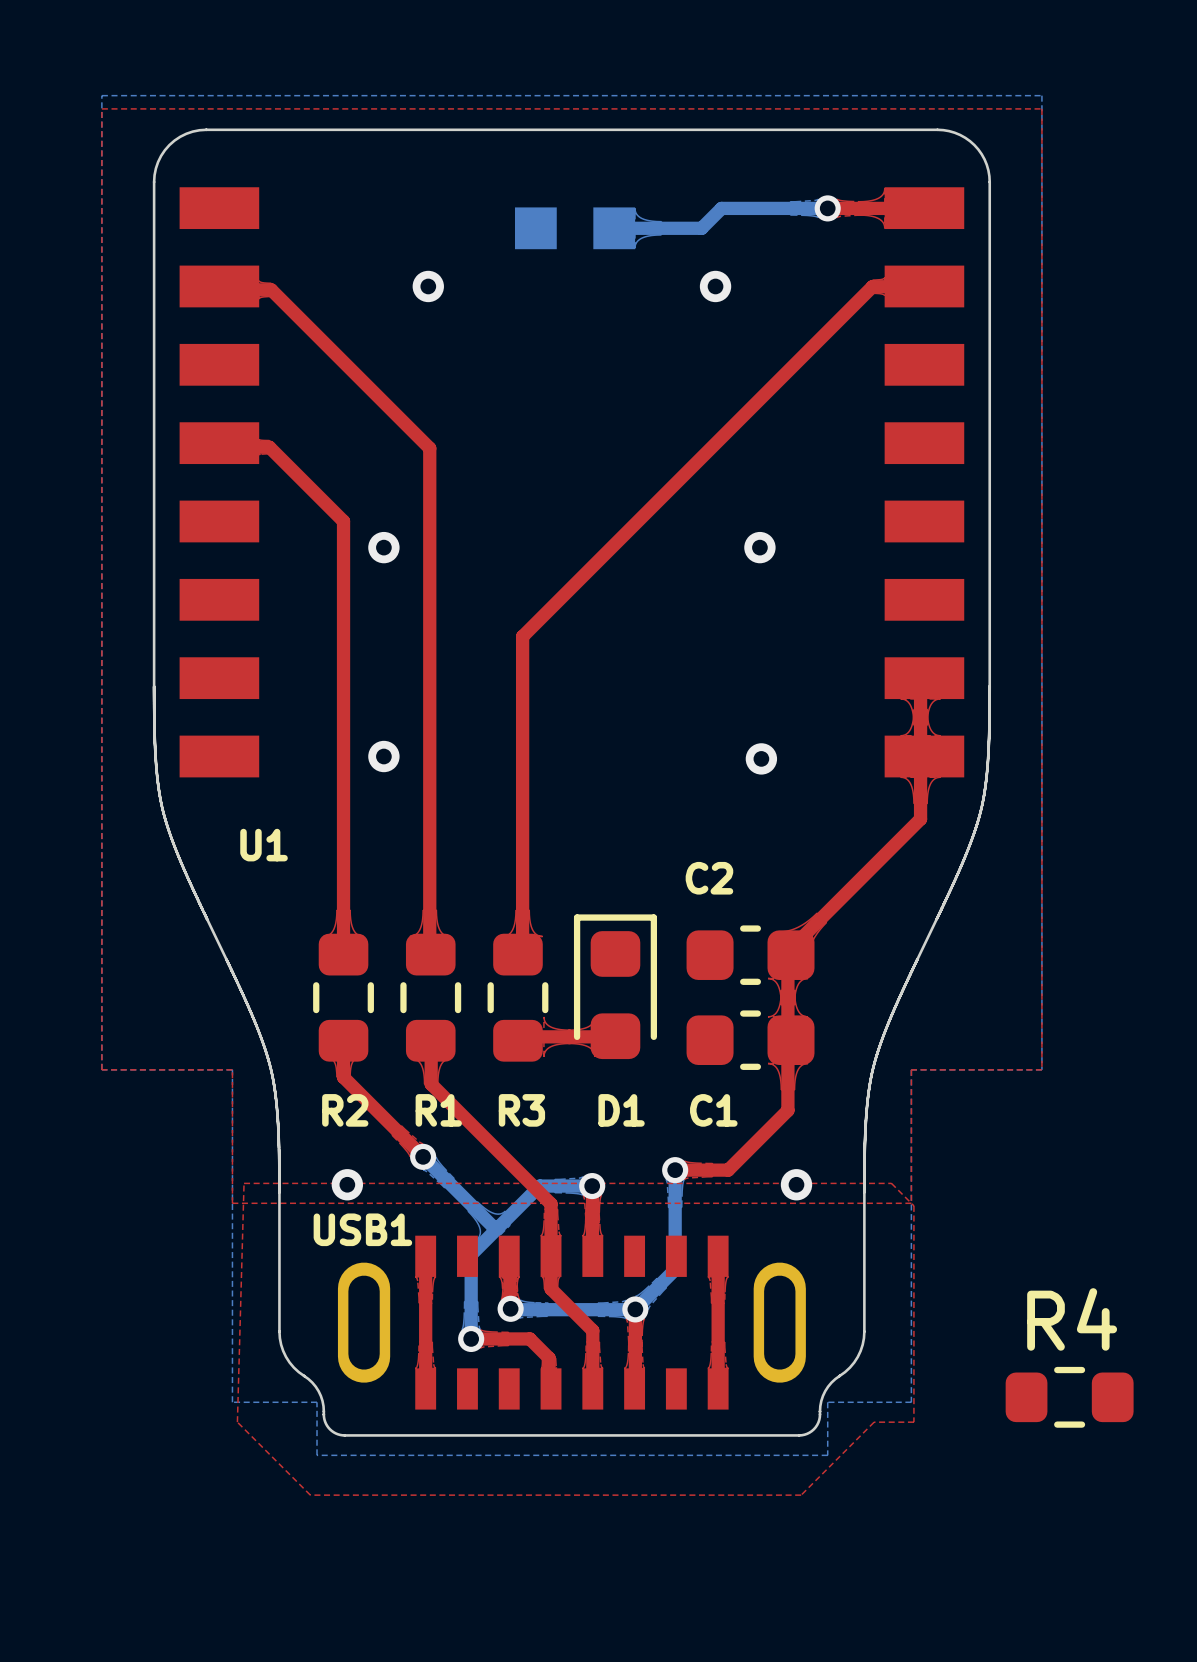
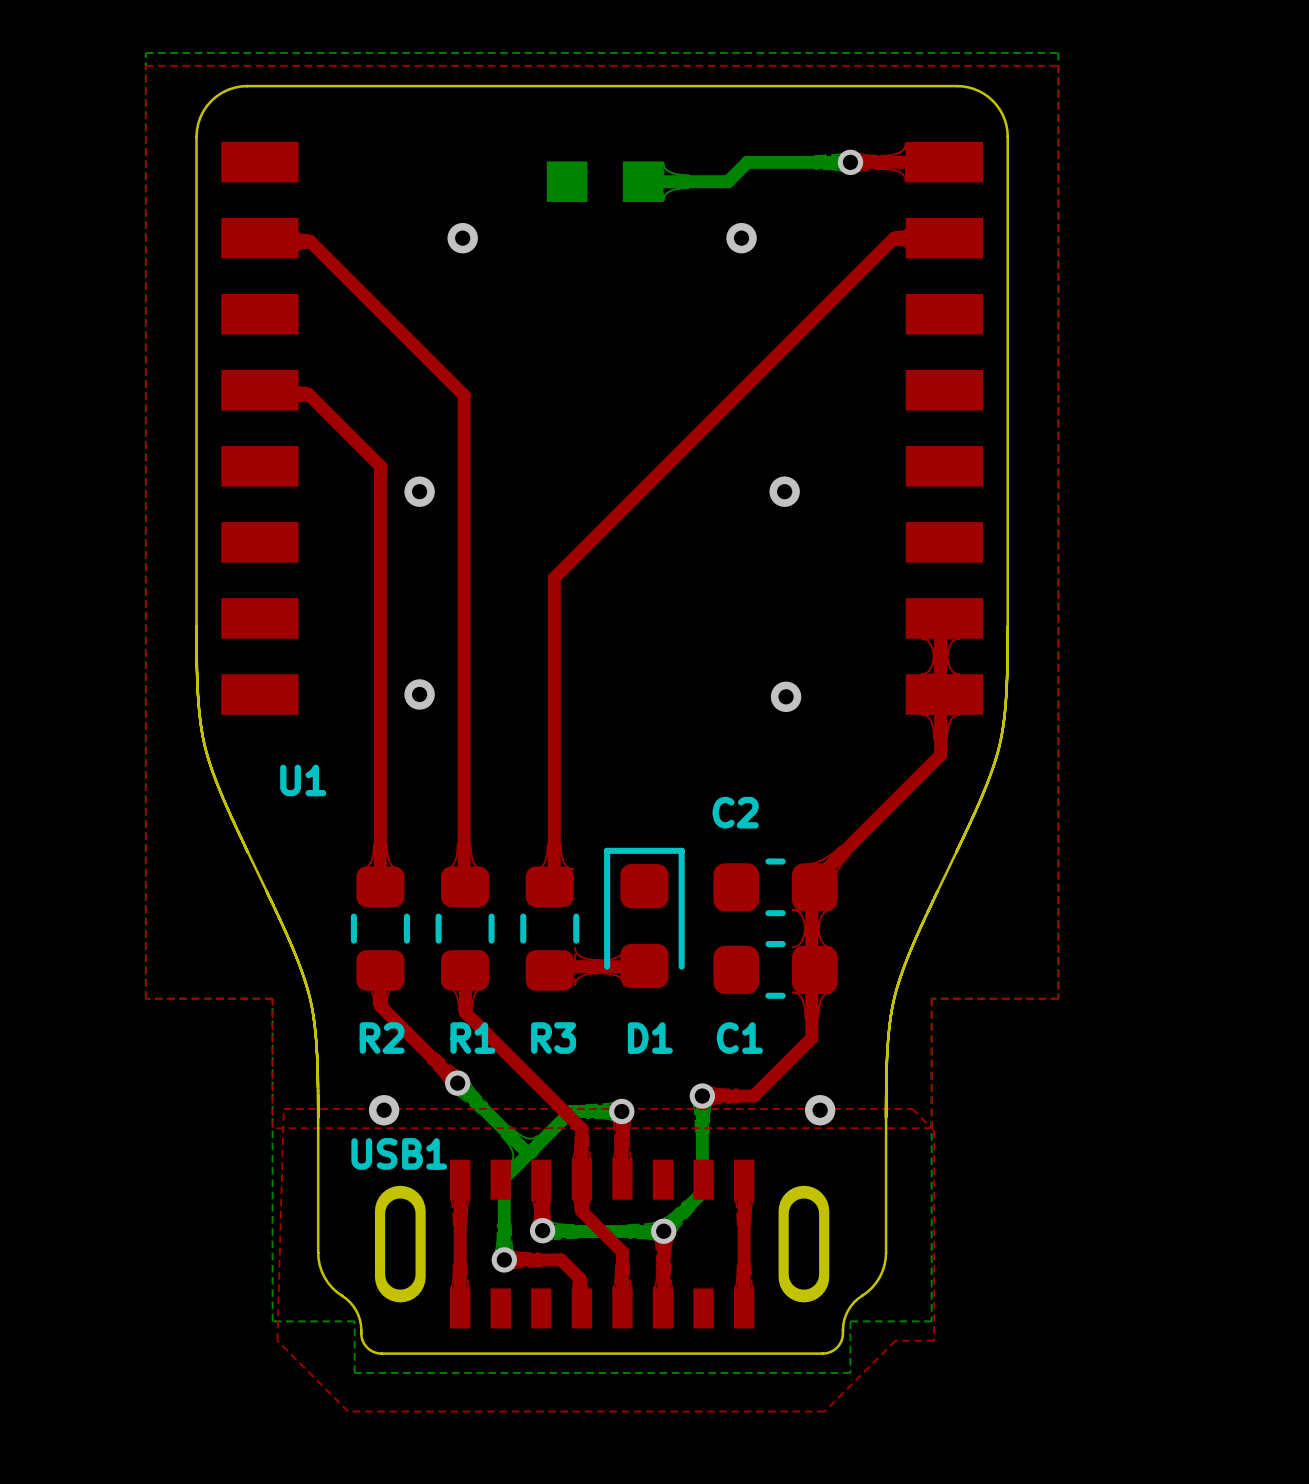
R4: (1069, 1397) -> none

